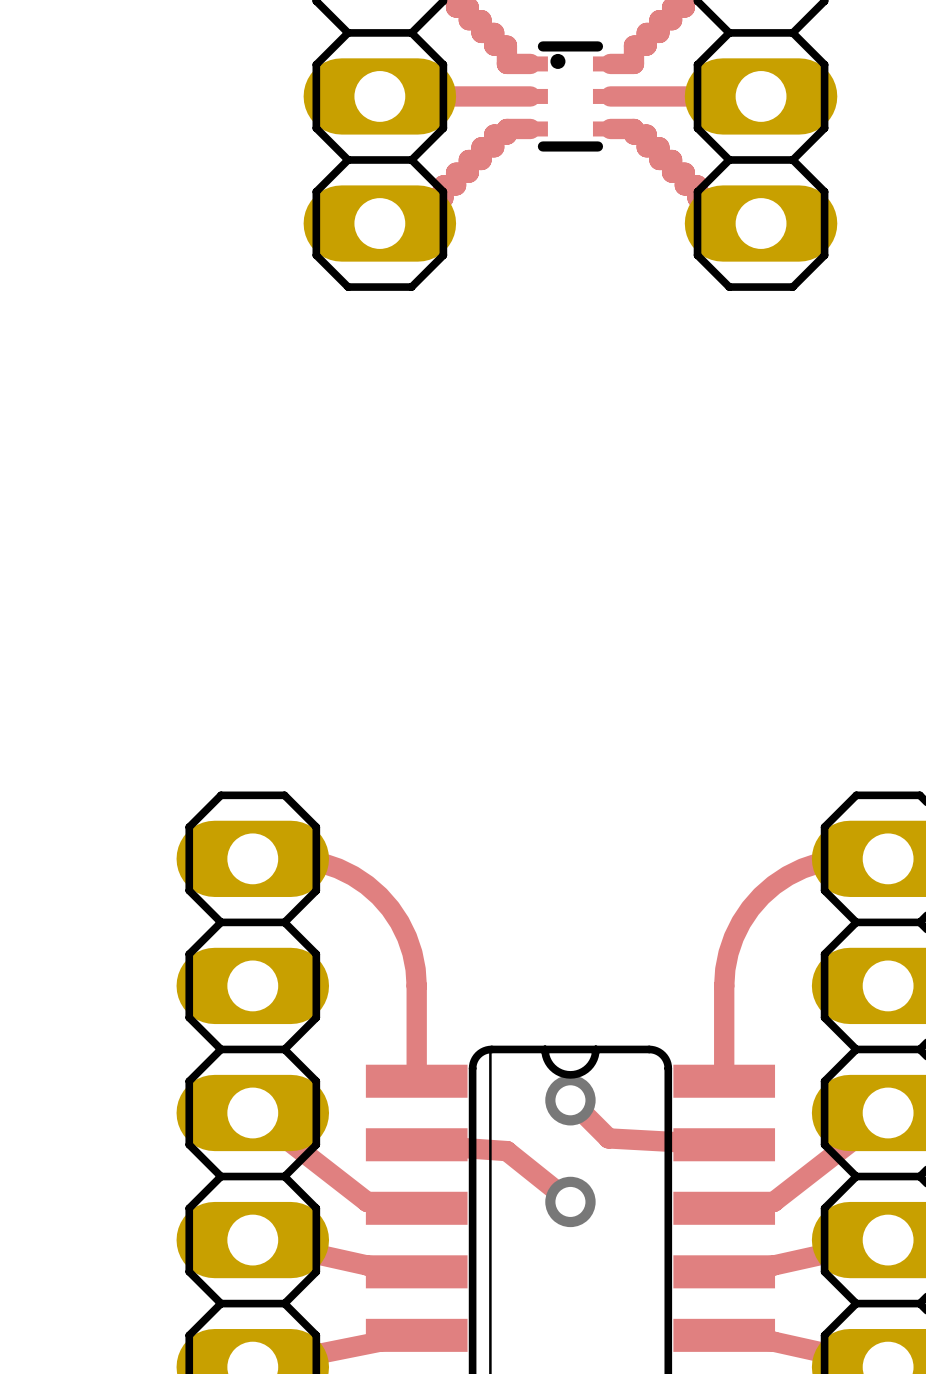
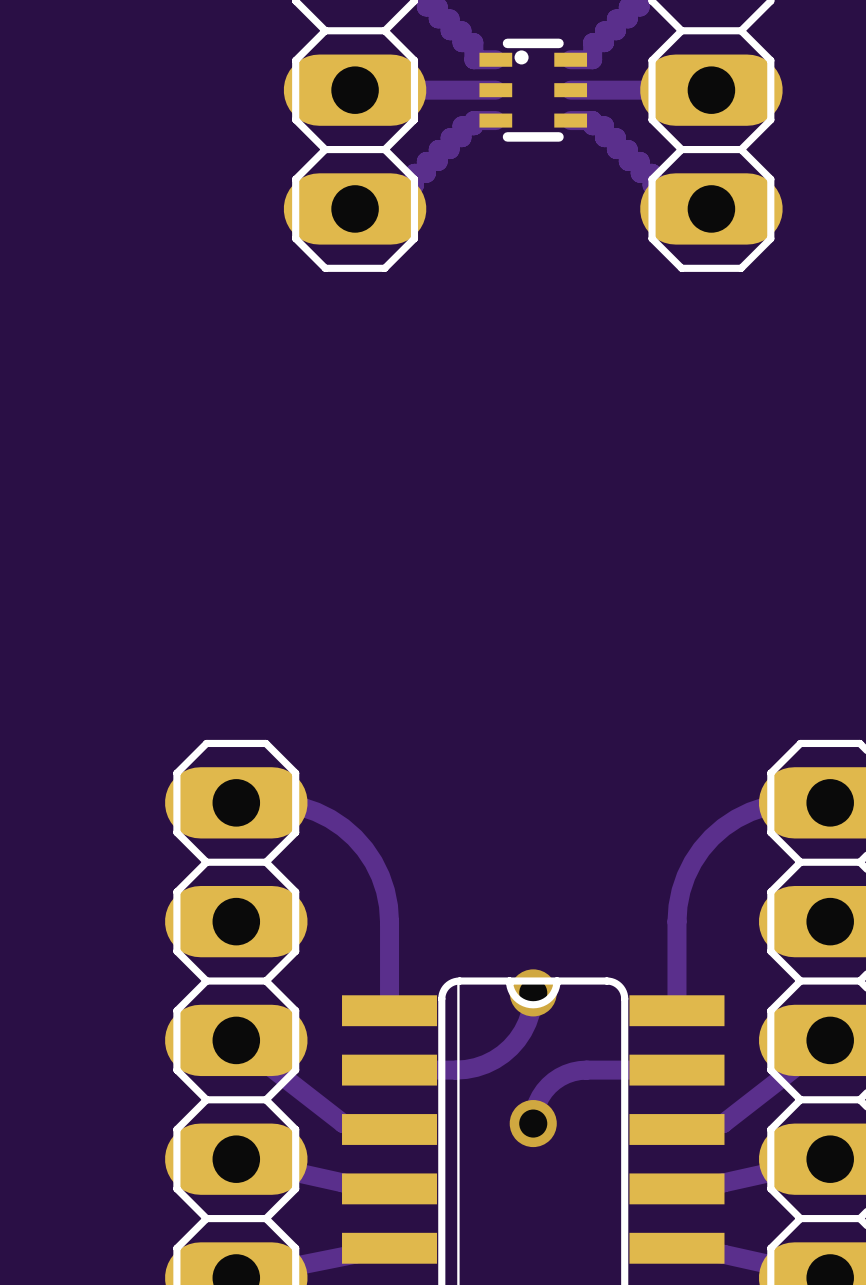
track: (570, 1100) (608, 1138) (724, 1144) -> (533, 1123) (535, 1109) (540, 1096) (554, 1081) (566, 1074) (586, 1070) (676, 1070)
via position: (570, 1100) -> (533, 992)
track: (416, 1144) (506, 1151) (570, 1201) -> (389, 1070) (466, 1069) (494, 1059) (510, 1047) (522, 1031) (530, 1012) (533, 992)

